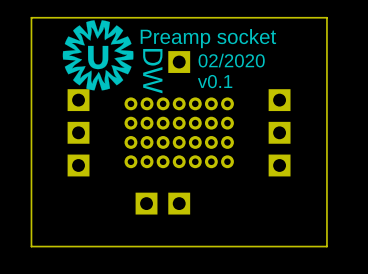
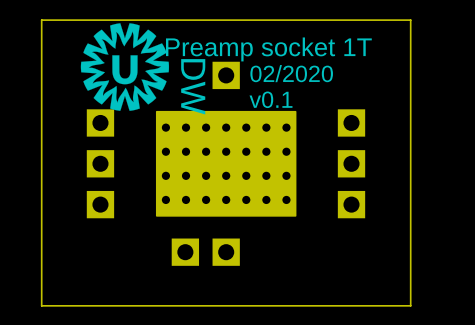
text: Preamp socket (208, 38) -> Preamp socket 1T (268, 49)
part footprint: [124, 97, 234, 169] -> [155, 110, 297, 217]

